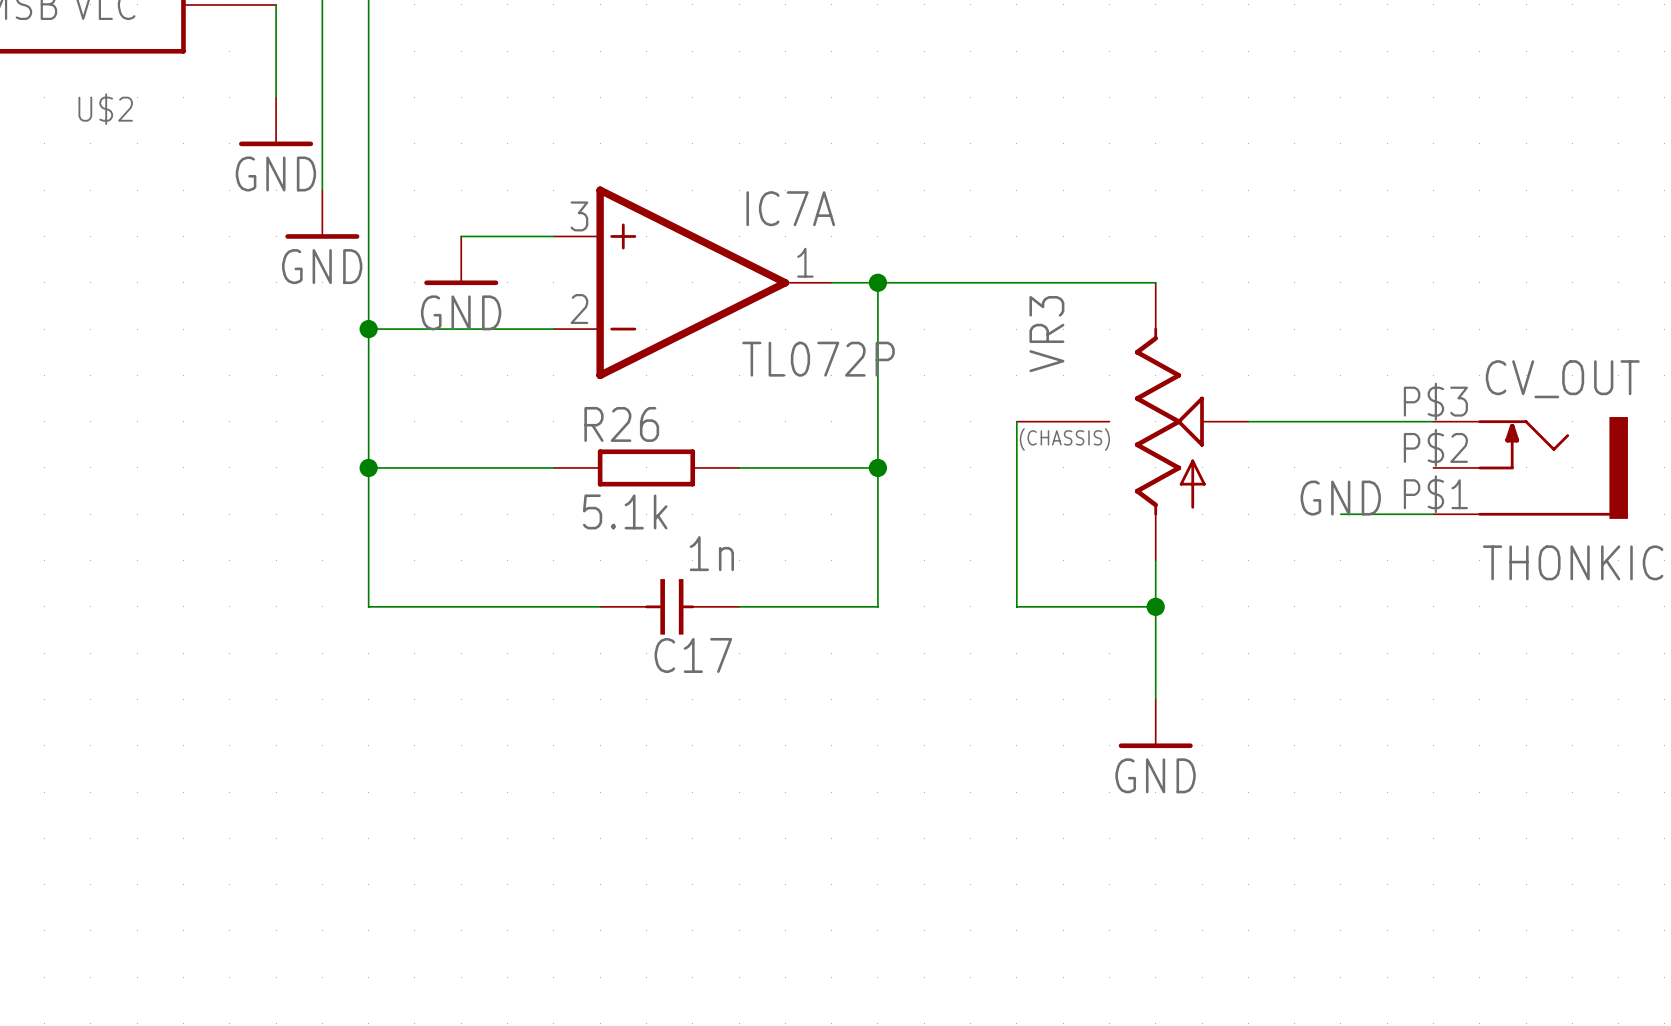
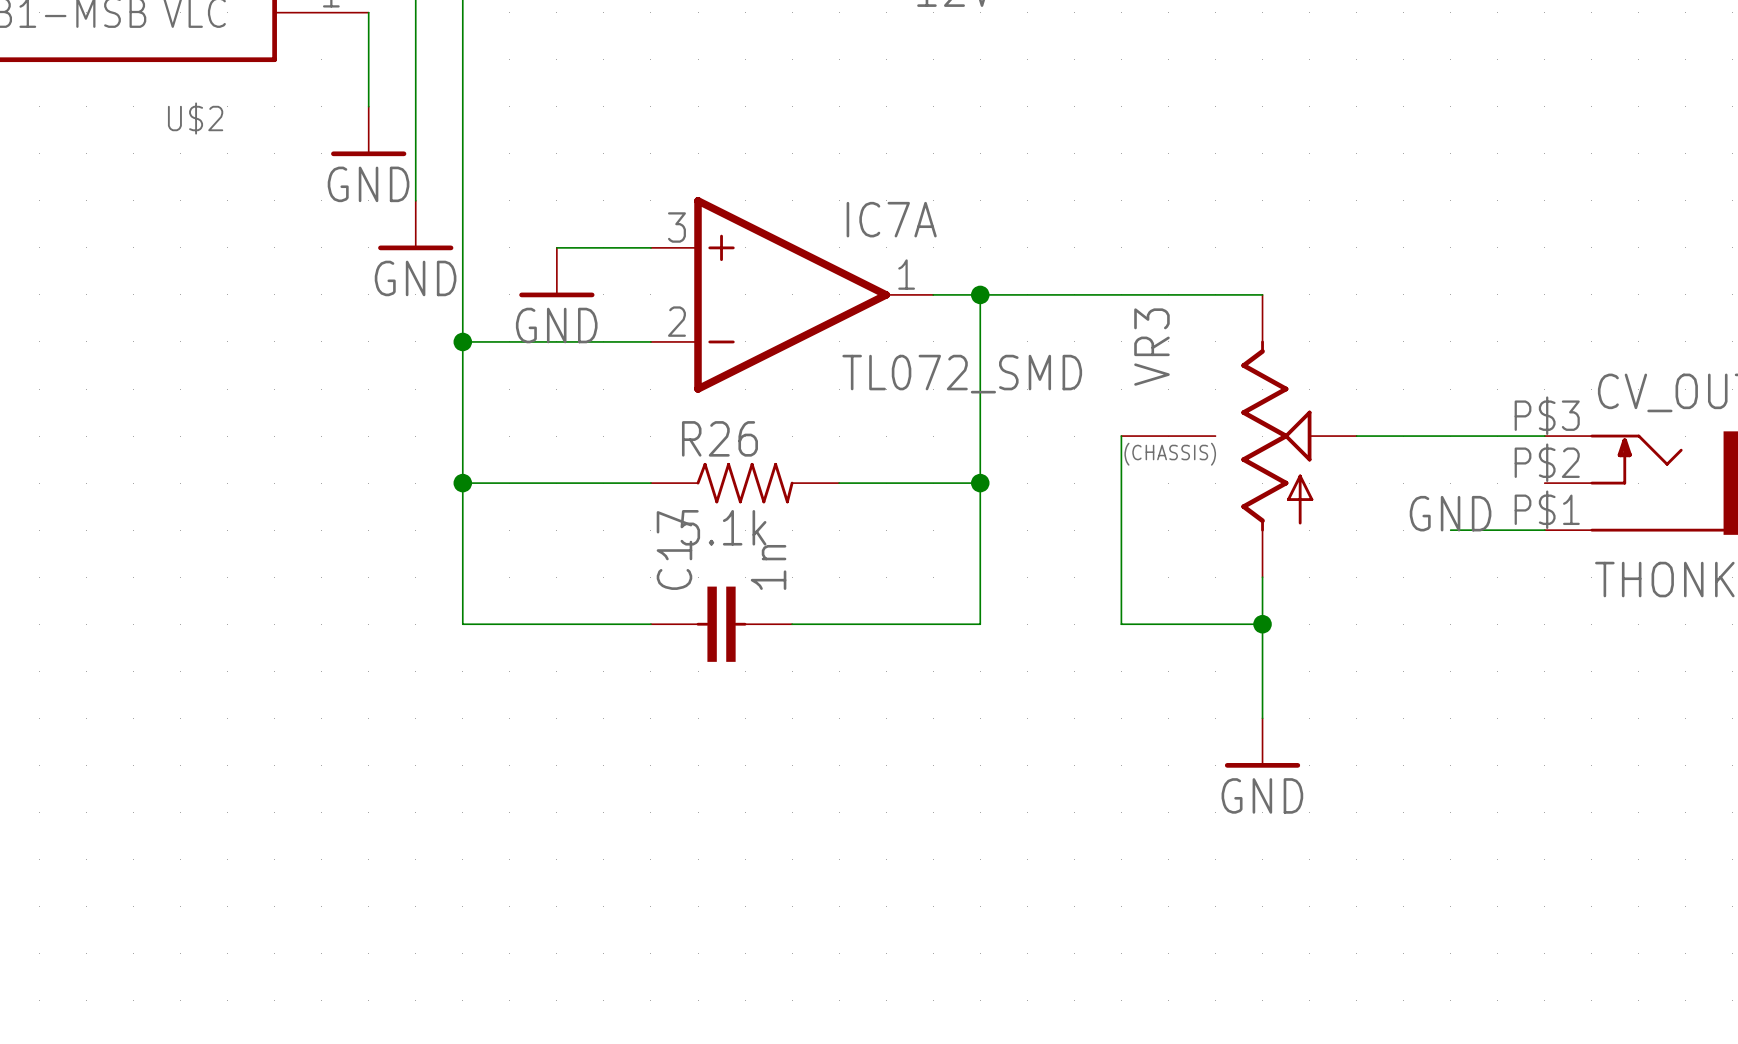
IC7A value: TL072P (818, 359) -> TL072_SMD (962, 374)
R26 symbol: [553, 449, 740, 487] -> [650, 462, 840, 504]
C17 symbol: [600, 579, 740, 635] -> [650, 586, 793, 662]
C17 name position: C17 (693, 655) -> C17 (674, 550)

